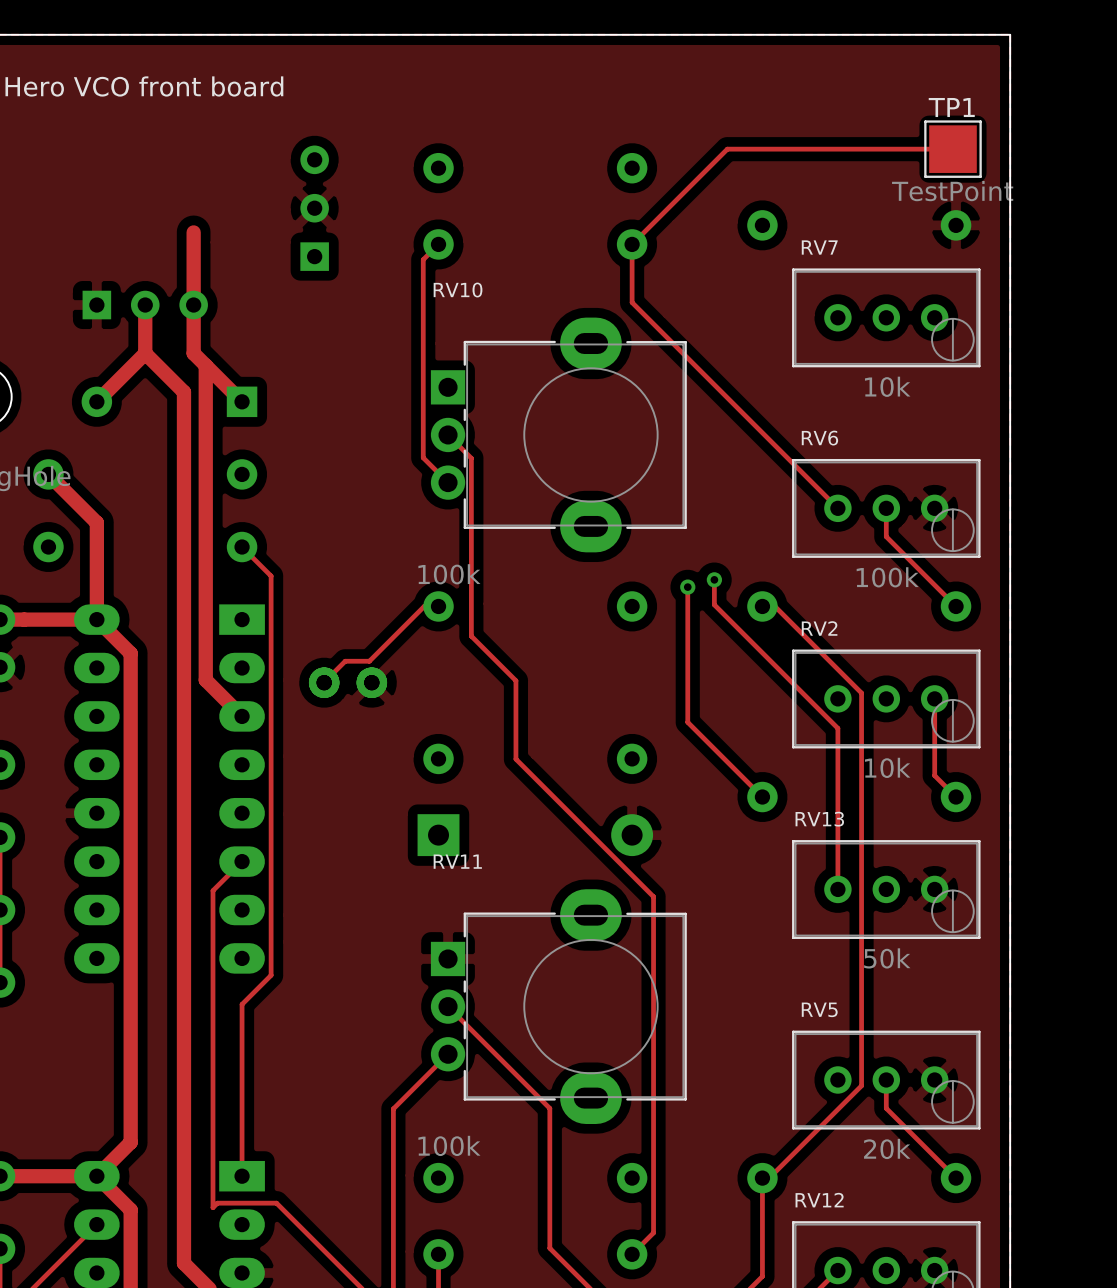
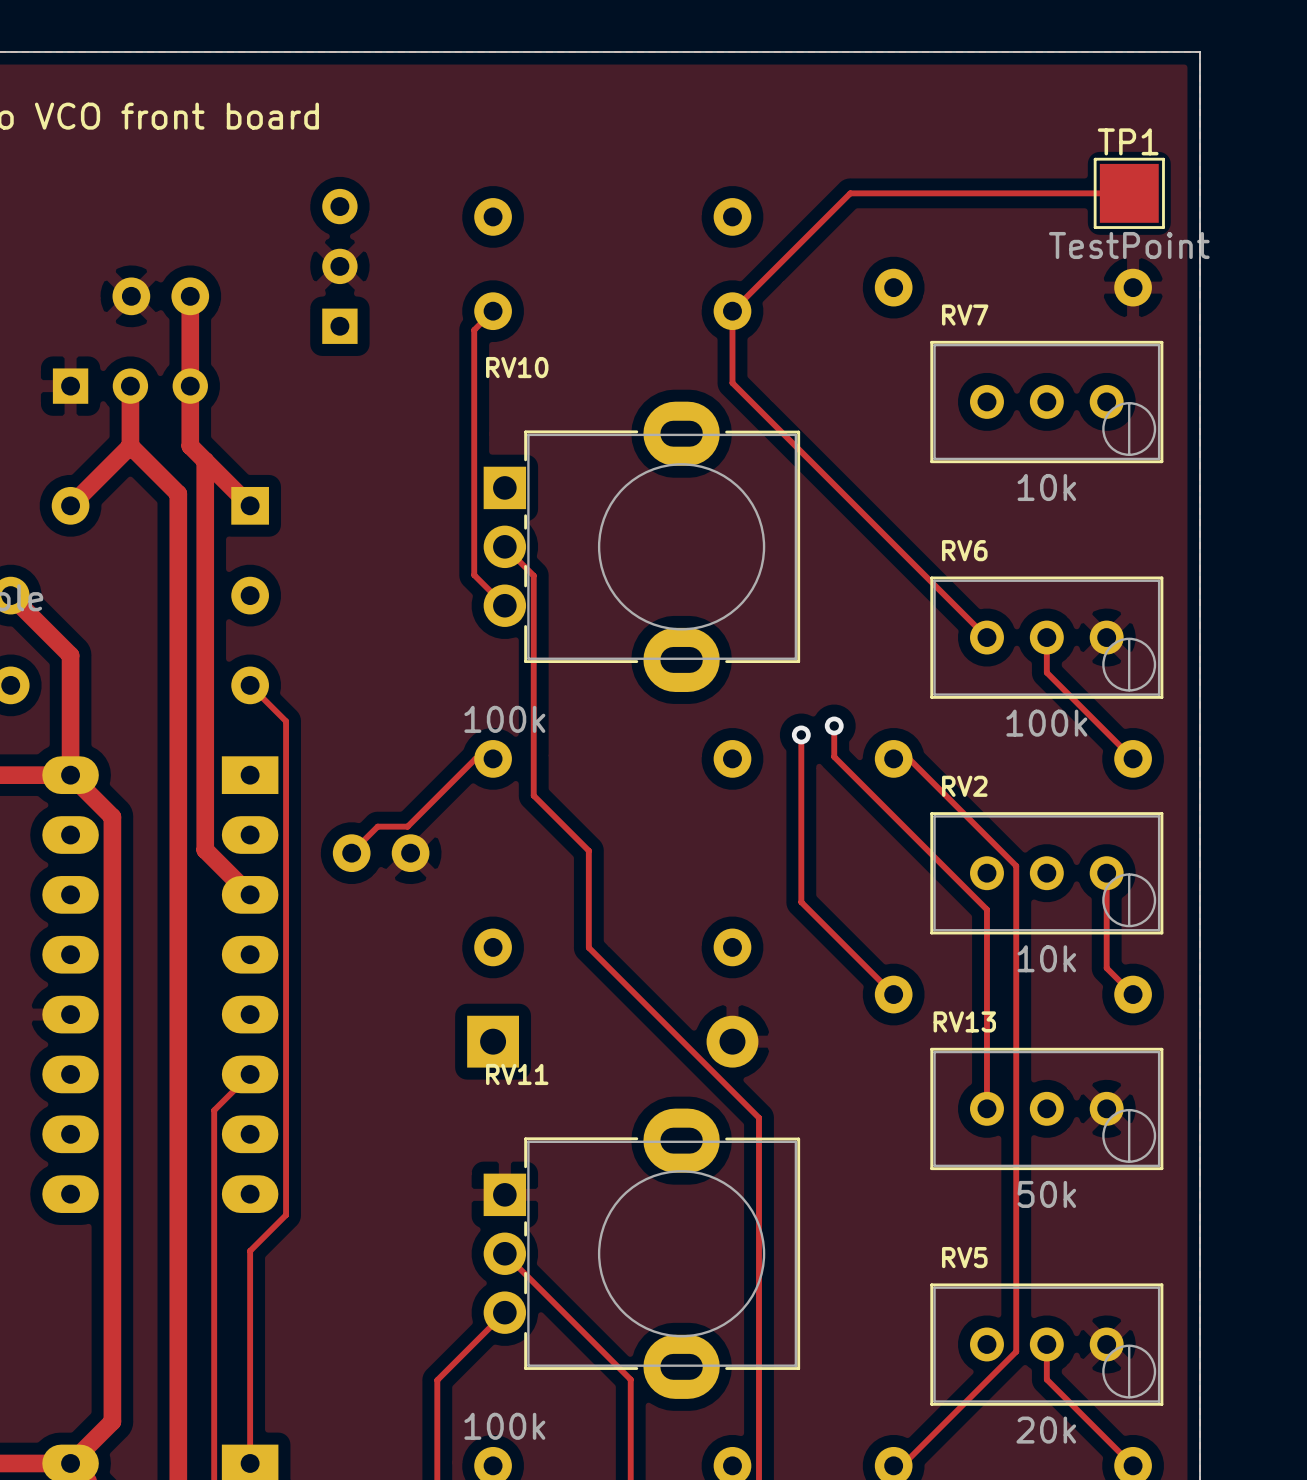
part: none -> (160, 296)
part: (348, 682) -> none

